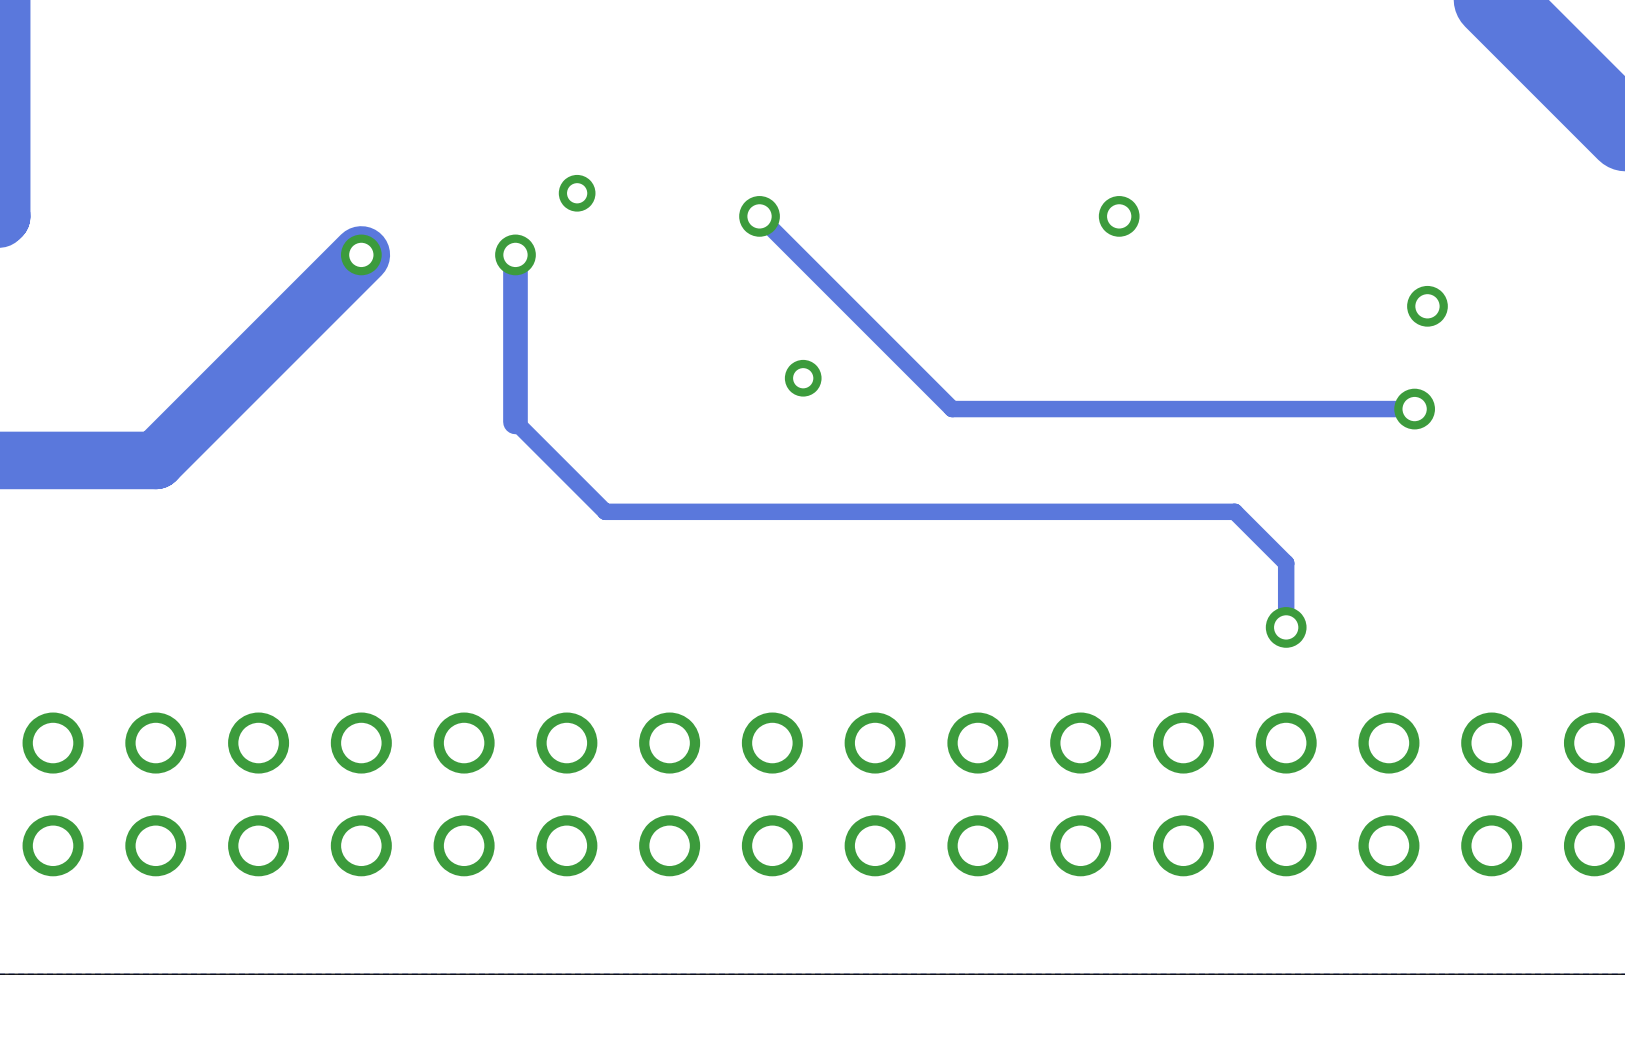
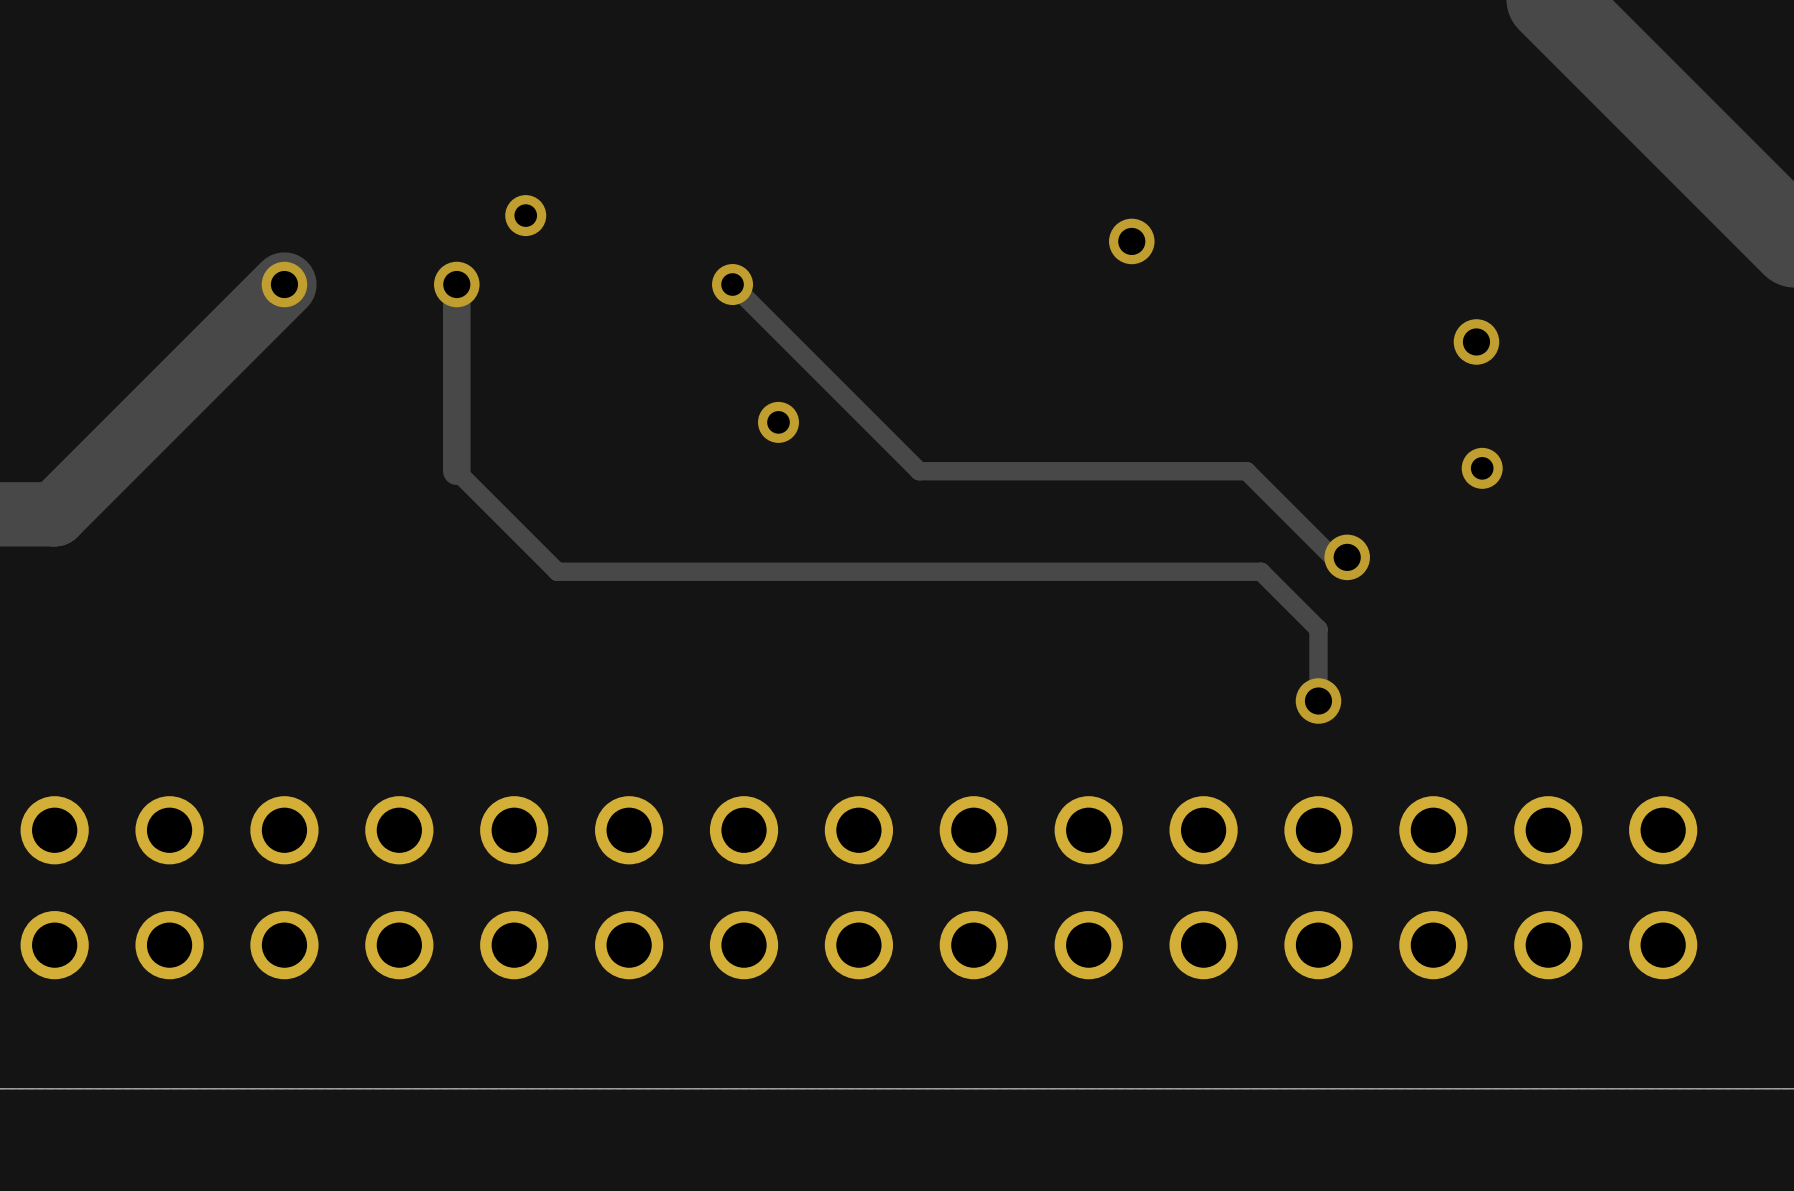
track: (759, 216) (952, 409) (1414, 409) -> none
via position: (759, 216) -> (732, 284)
track: none -> (732, 284) (919, 471) (1246, 471) (1332, 557) (1347, 557)
via position: (1414, 409) -> (1347, 557)
via: none -> (1482, 468)

